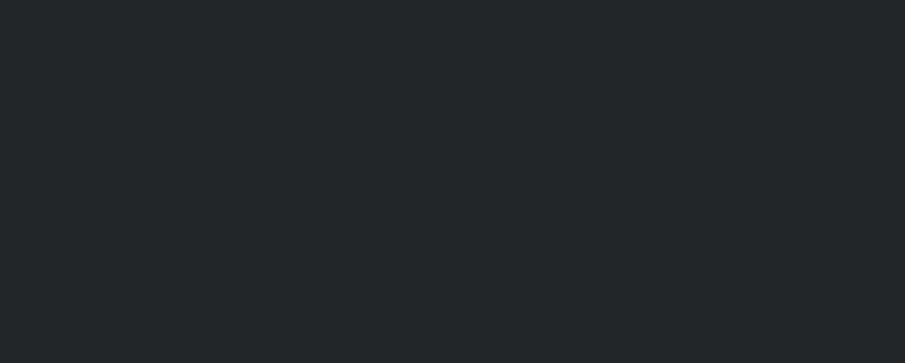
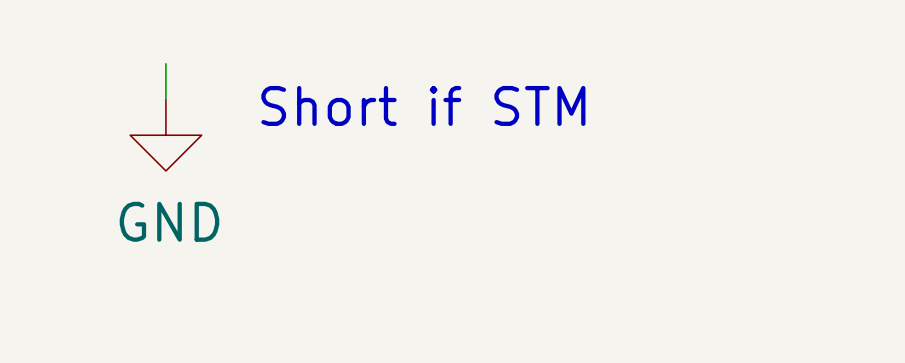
wire: none -> (165, 63) (165, 99)
text: none -> Short if STM (423, 105)
power symbol: none -> GND (165, 135)

